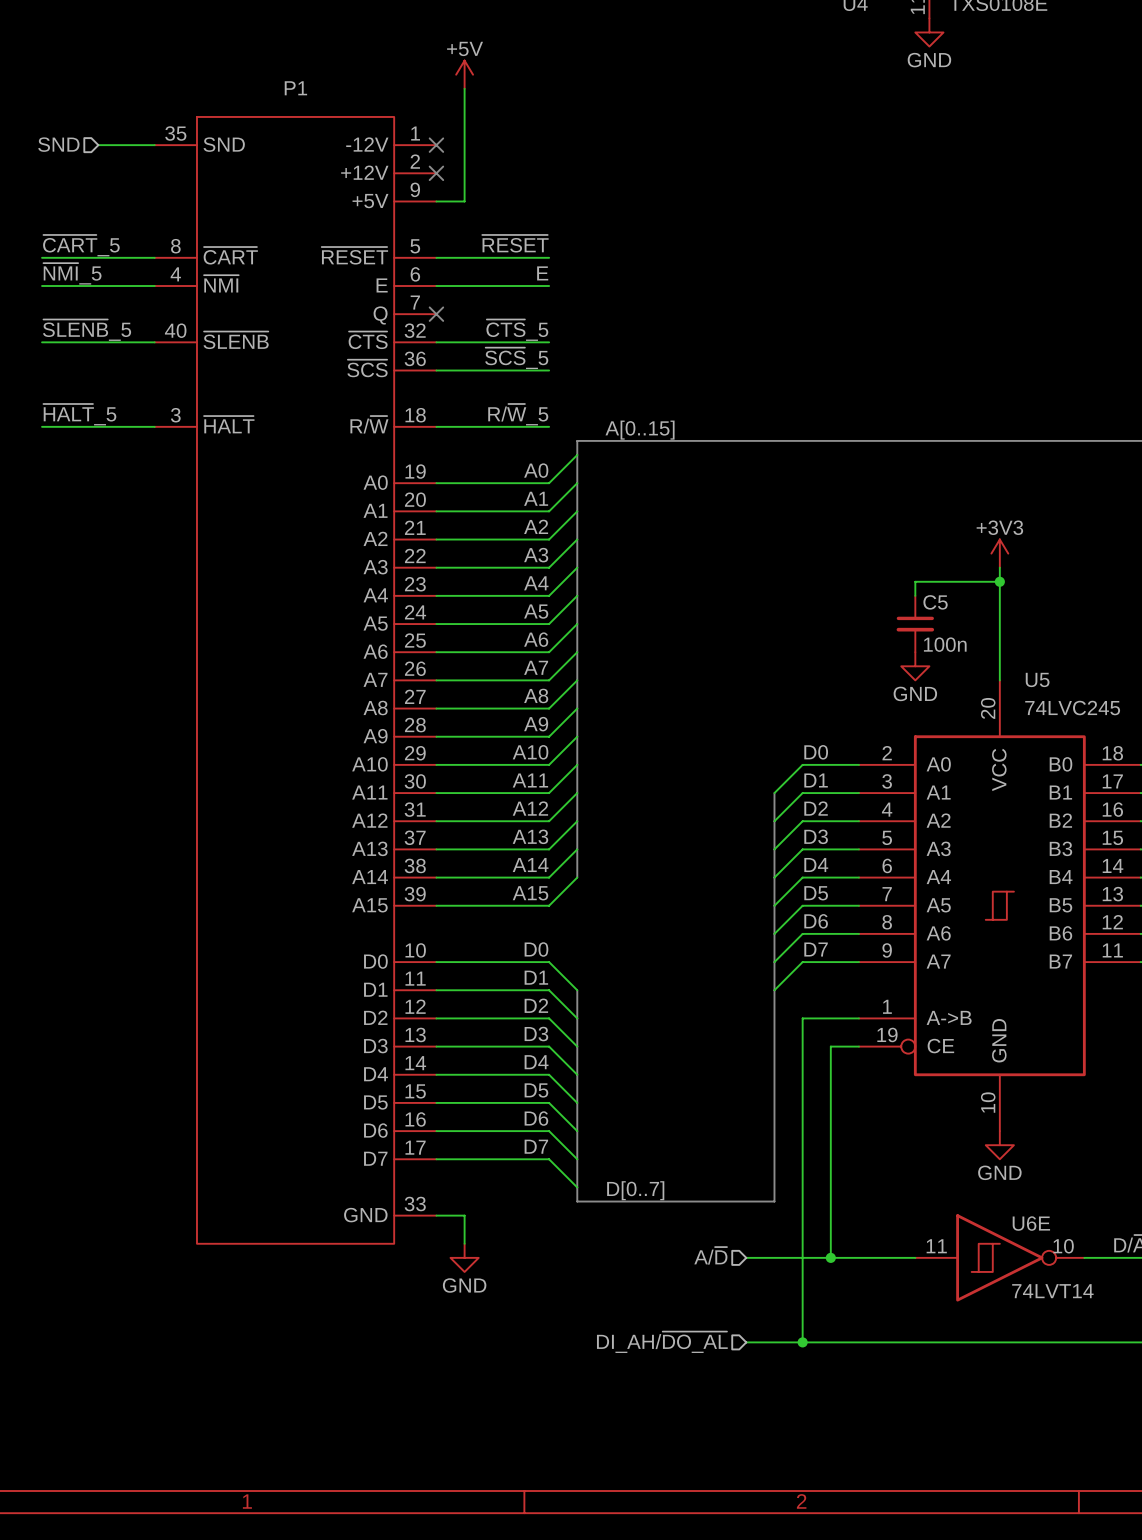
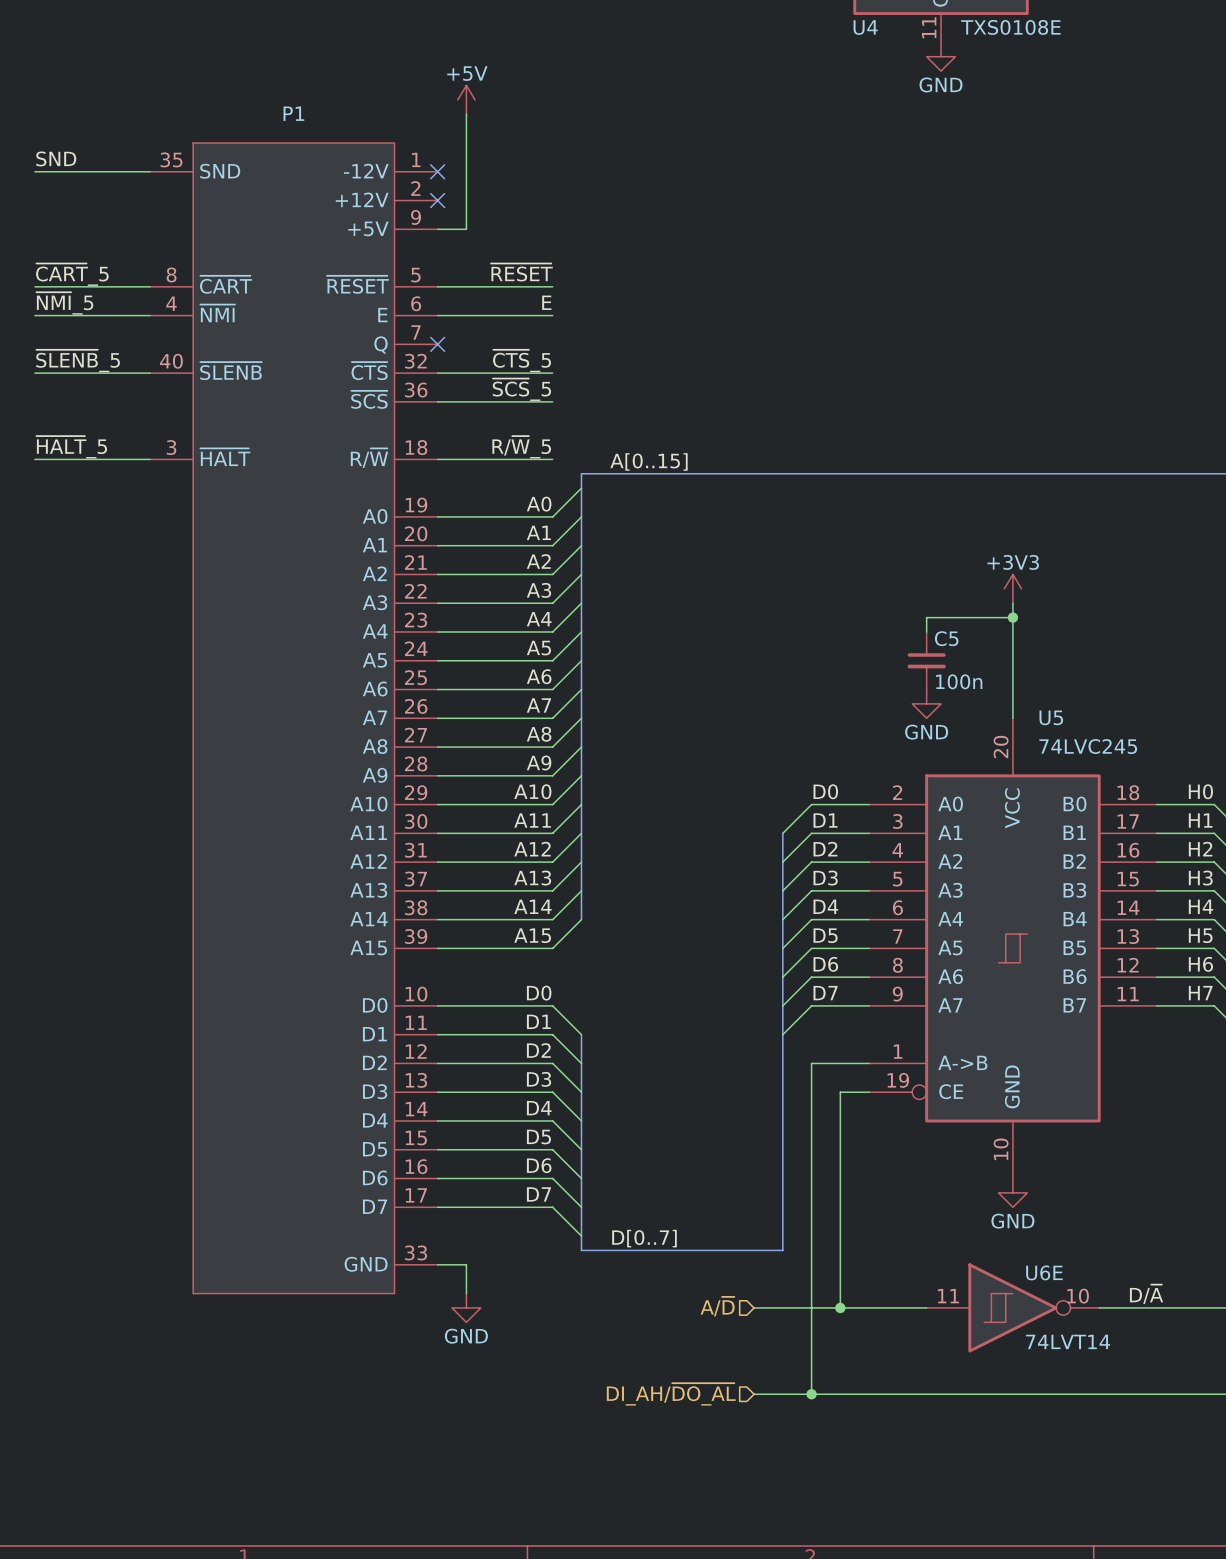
label: none -> SND (56, 158)
hierarchical label: SND (58, 144) -> none
wire: none -> (34, 171) (92, 171)

